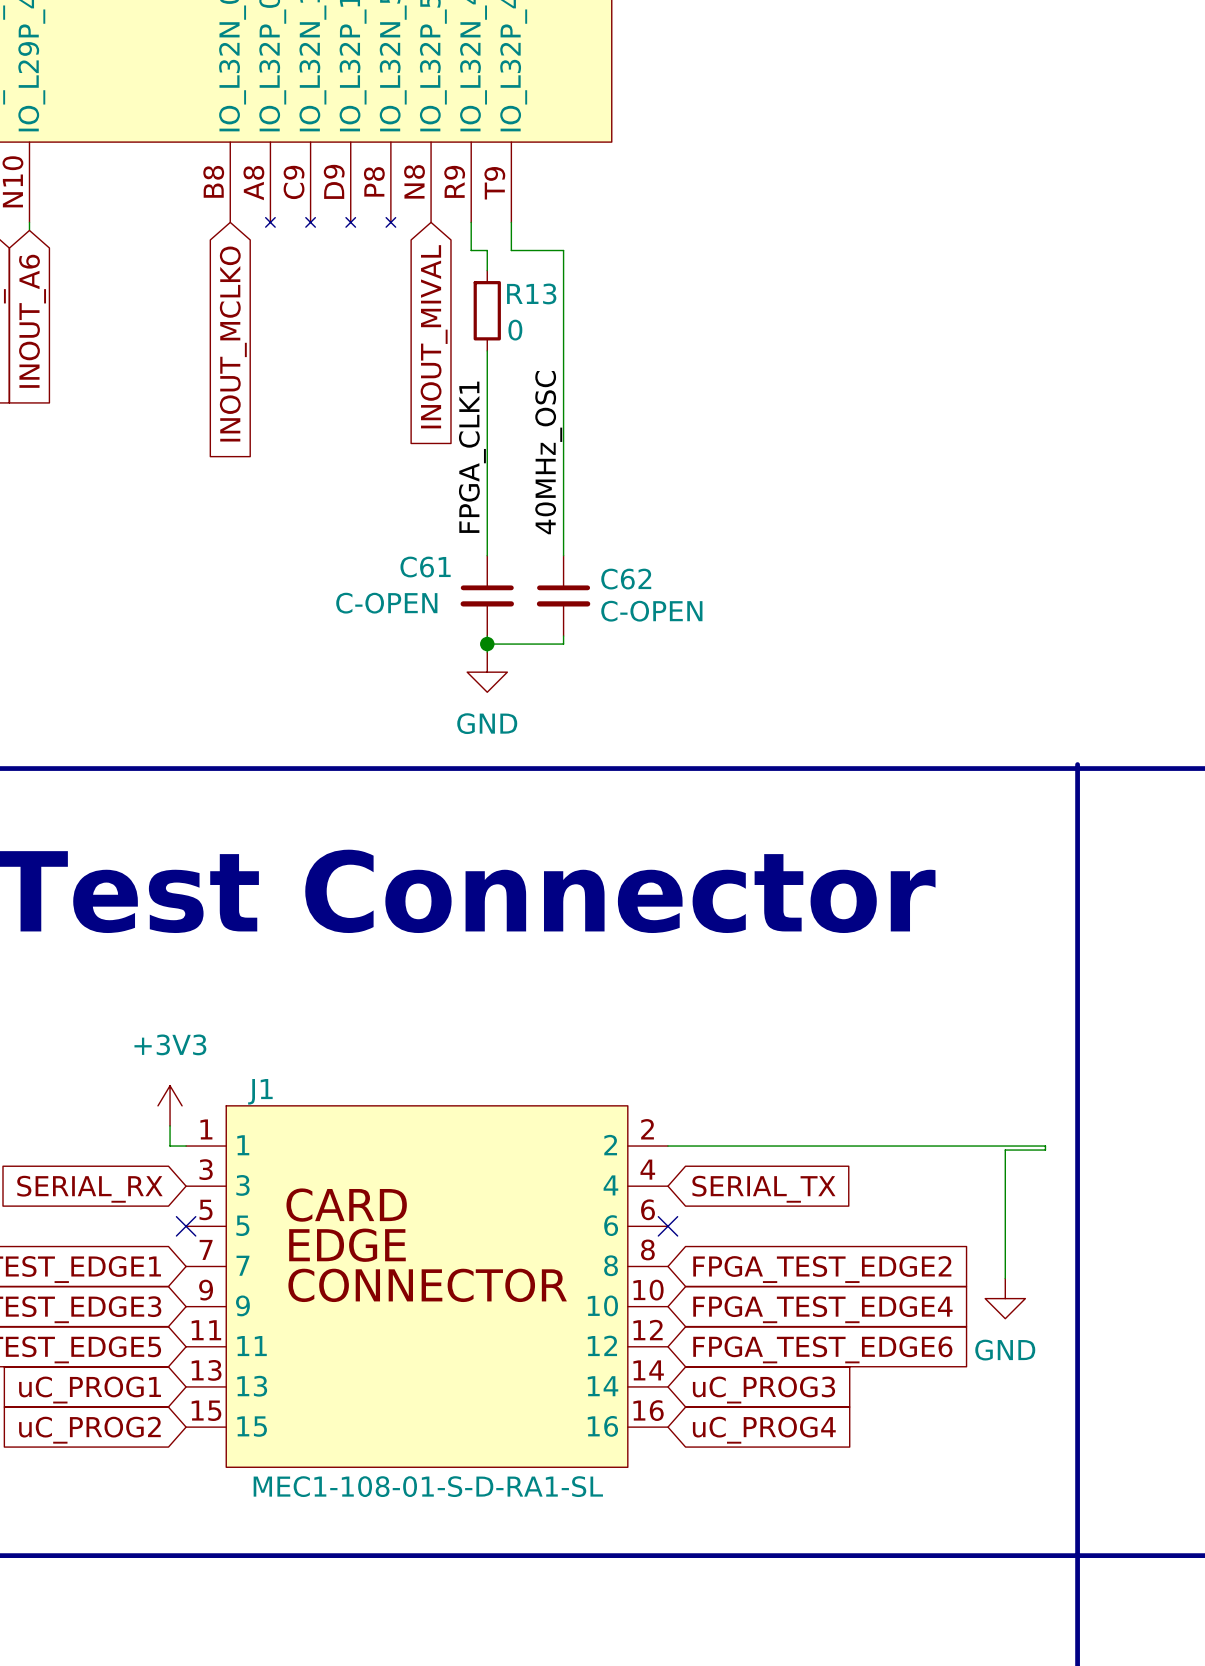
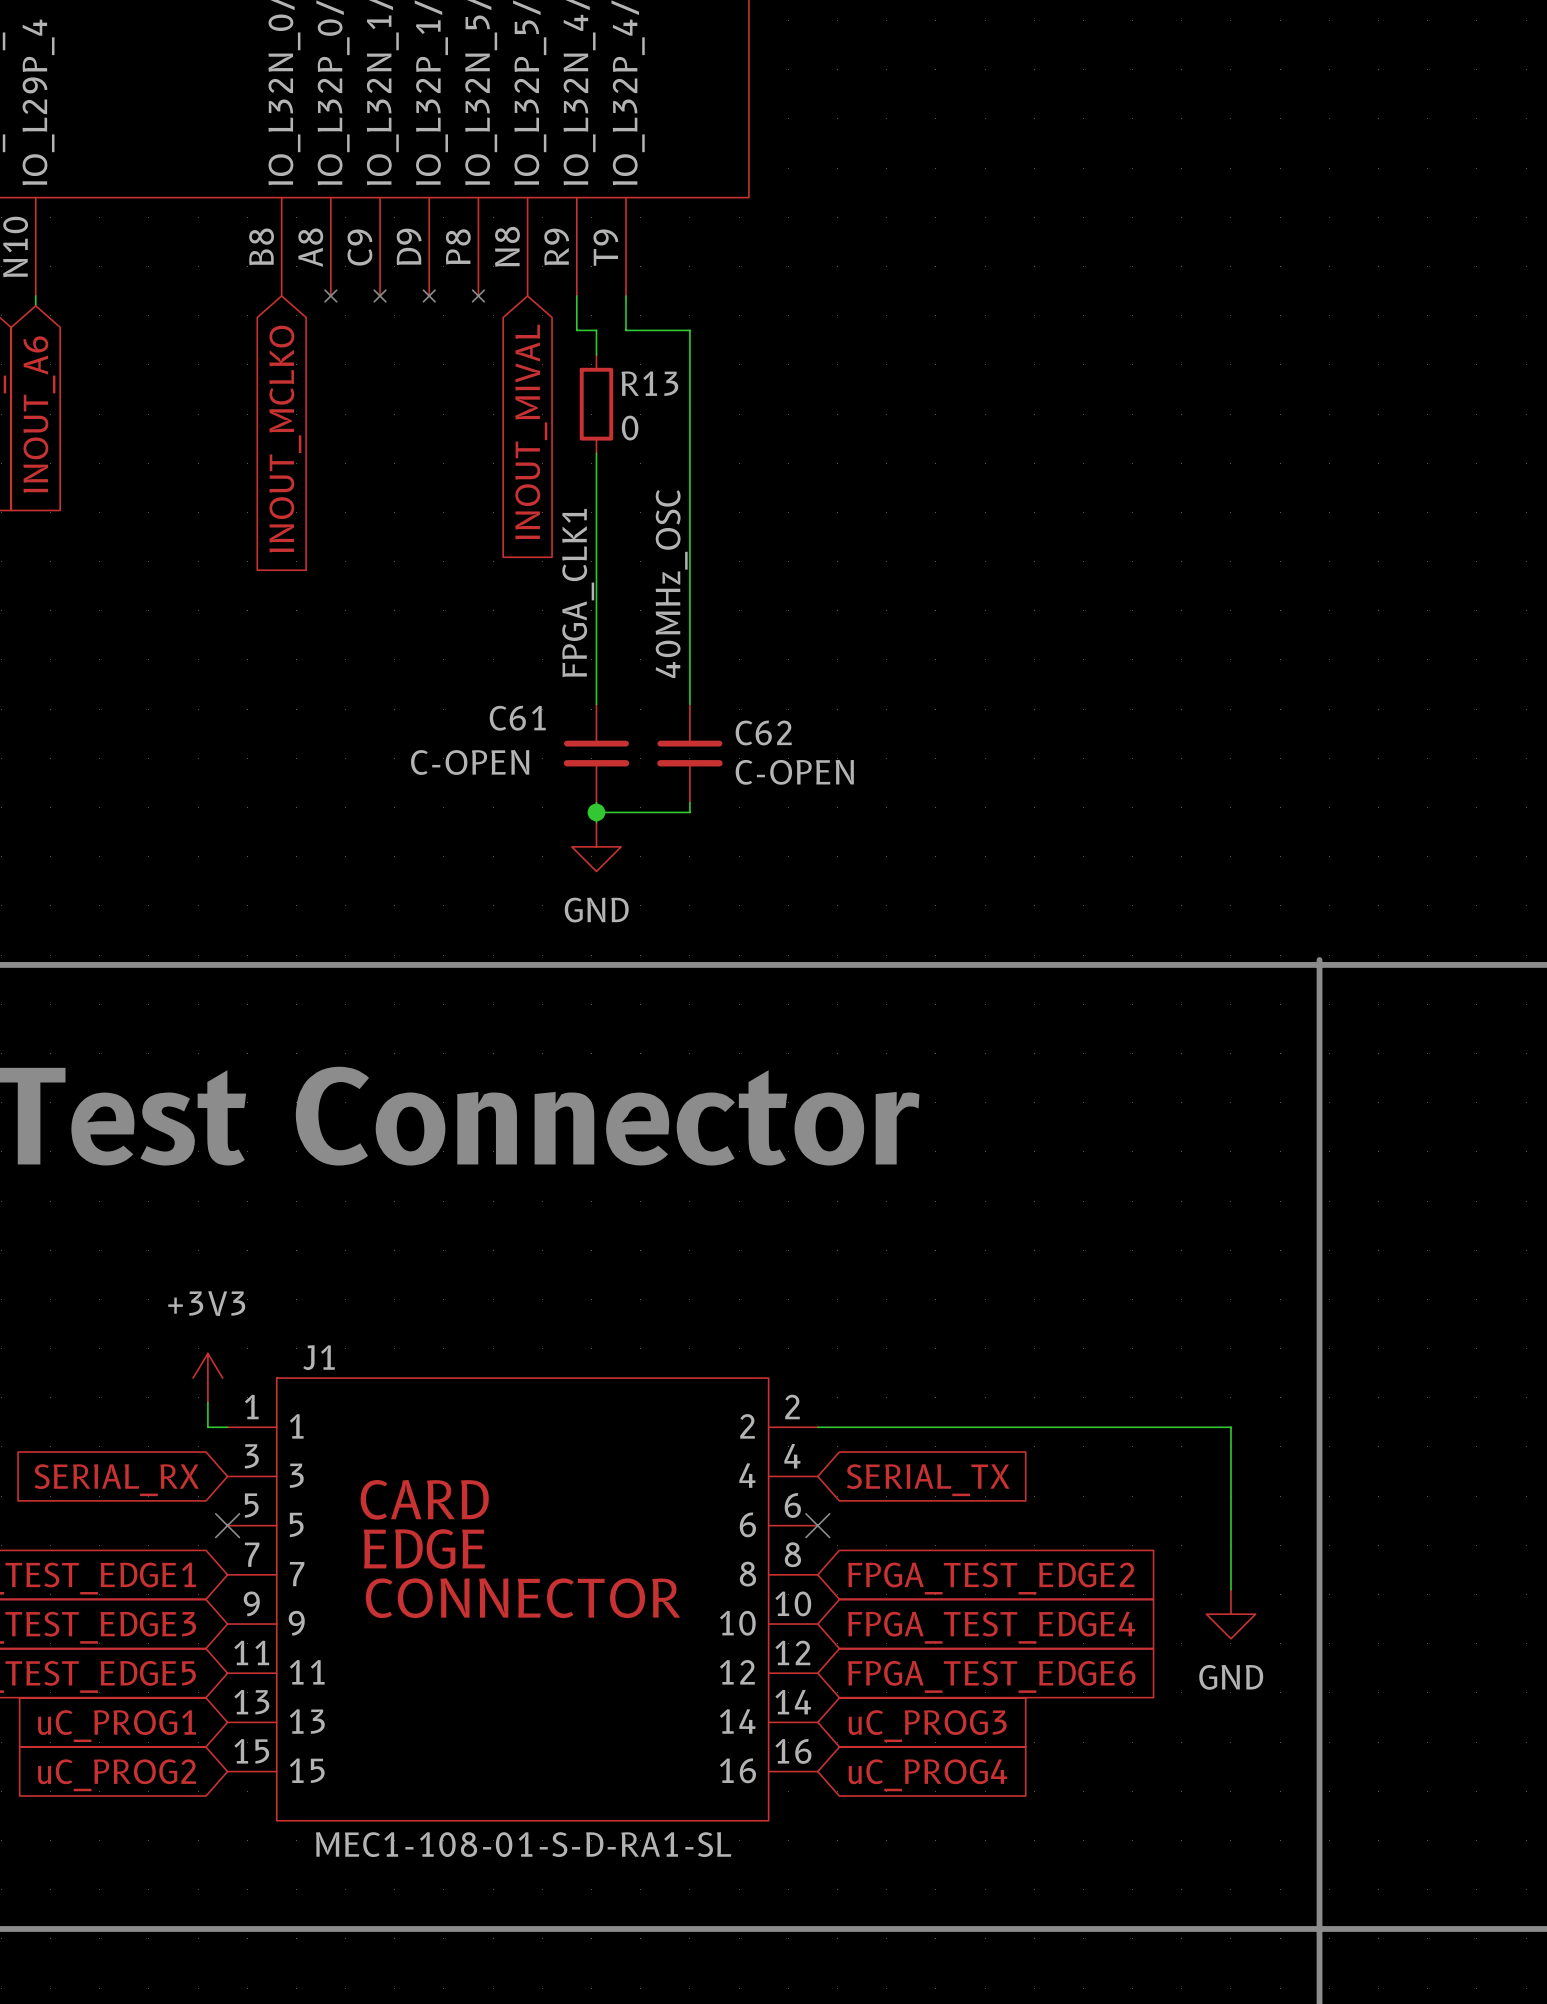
wire: (1005, 1146) (1045, 1146) (1045, 1150) (1005, 1150) -> (1230, 1427) (1230, 1432)

